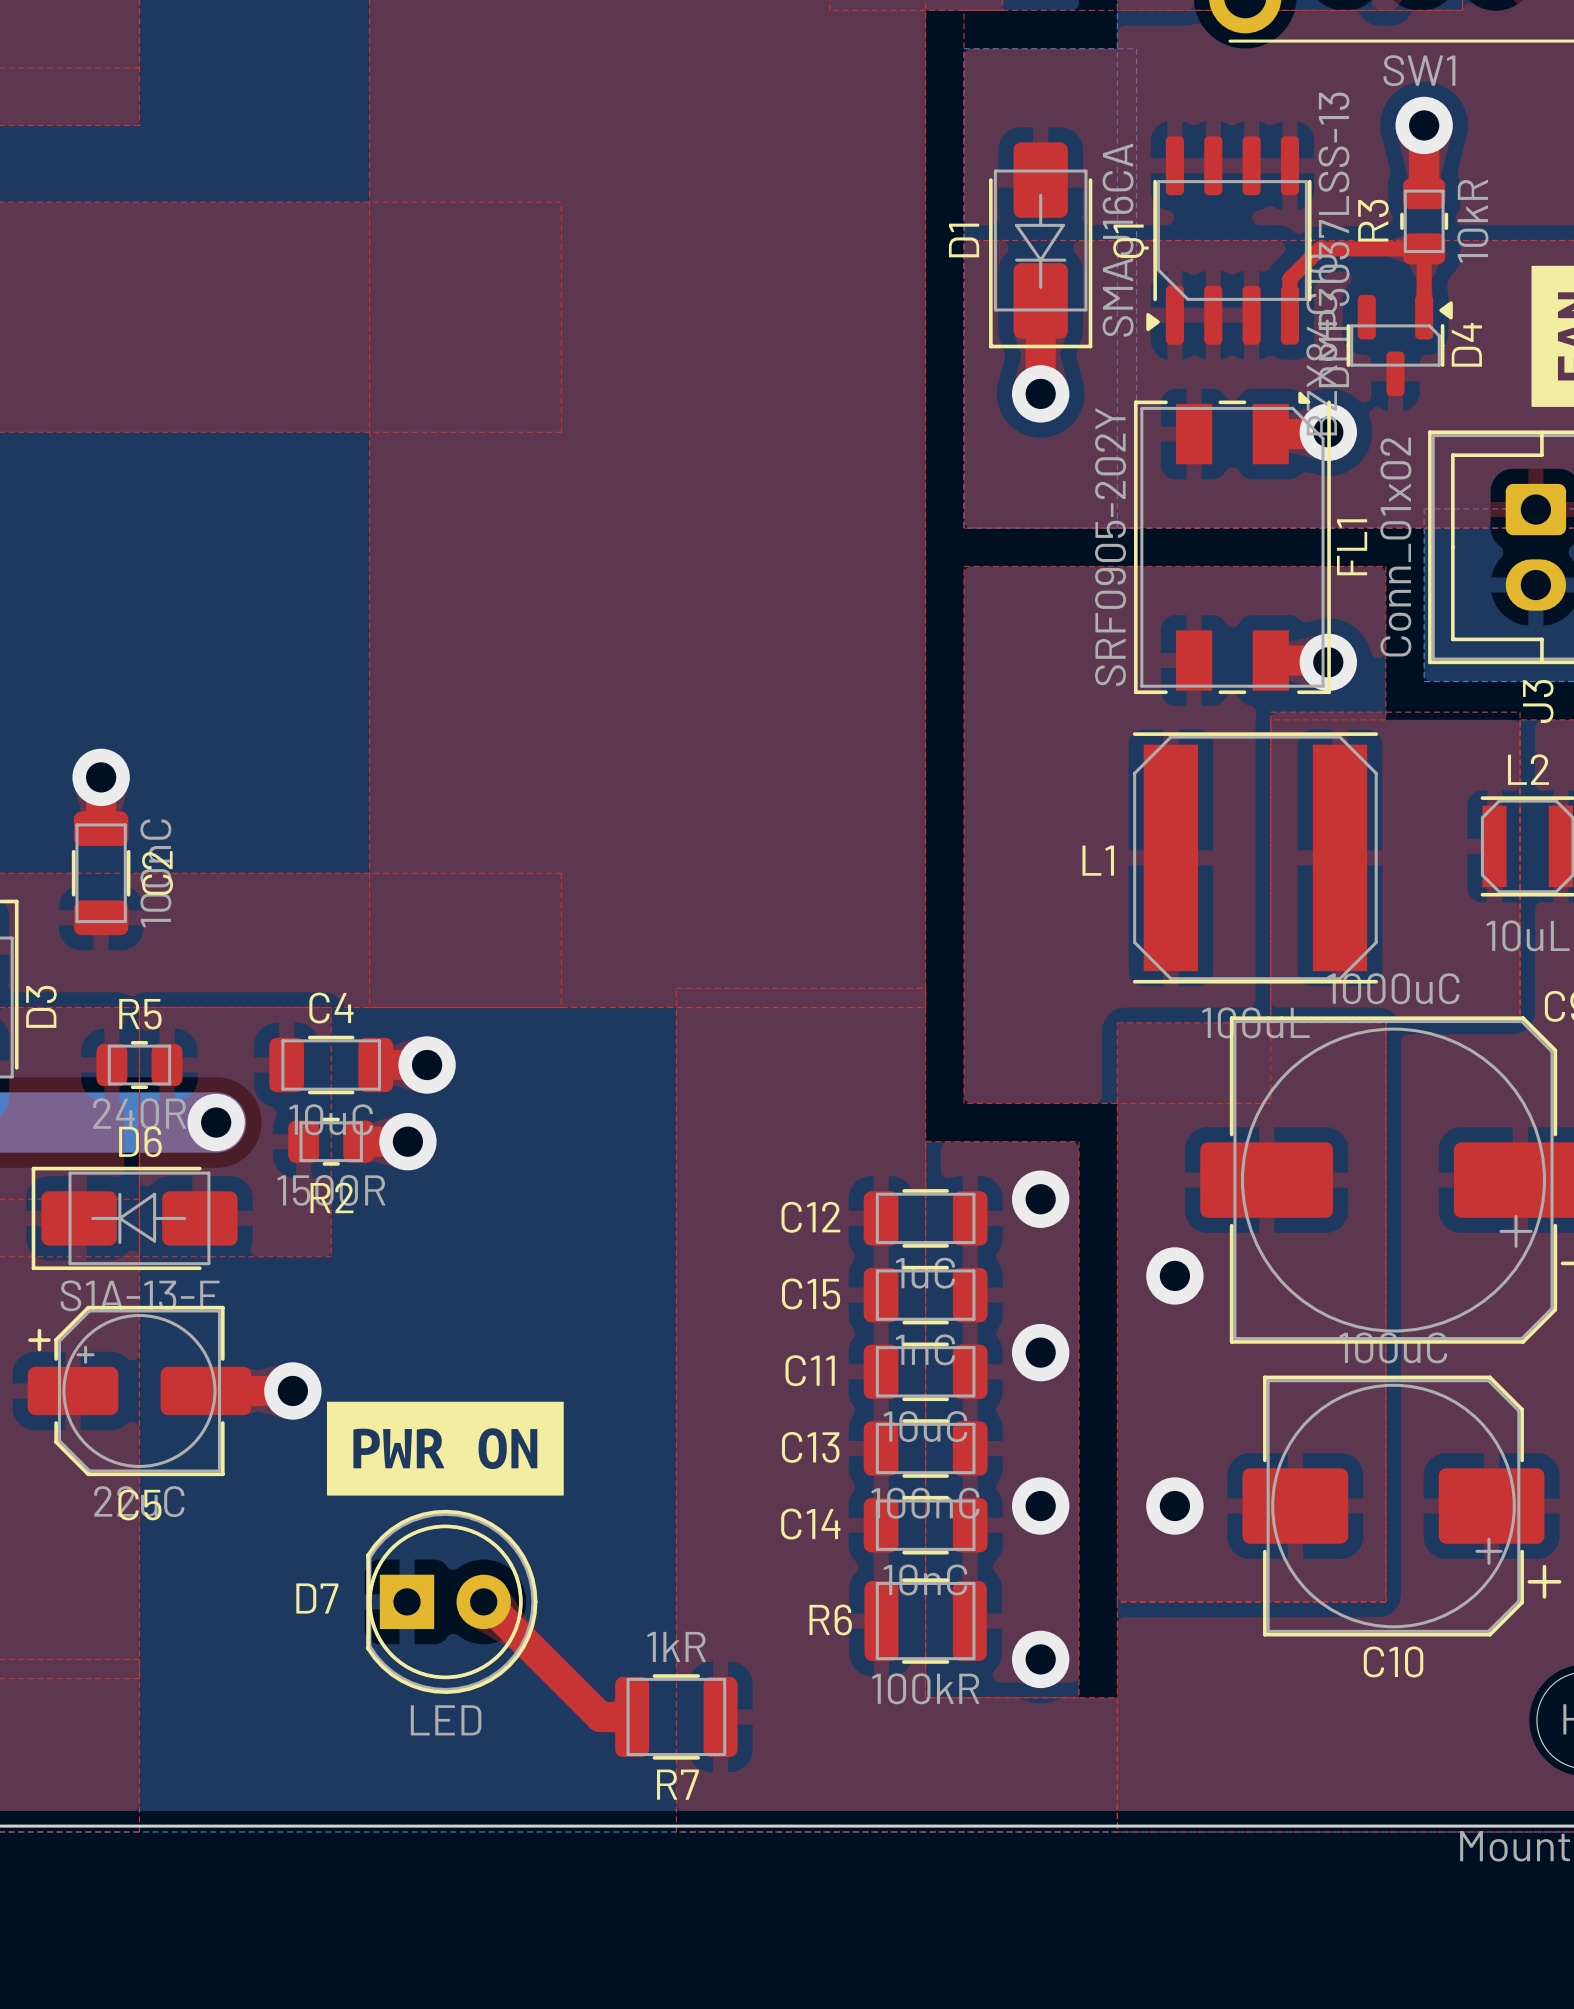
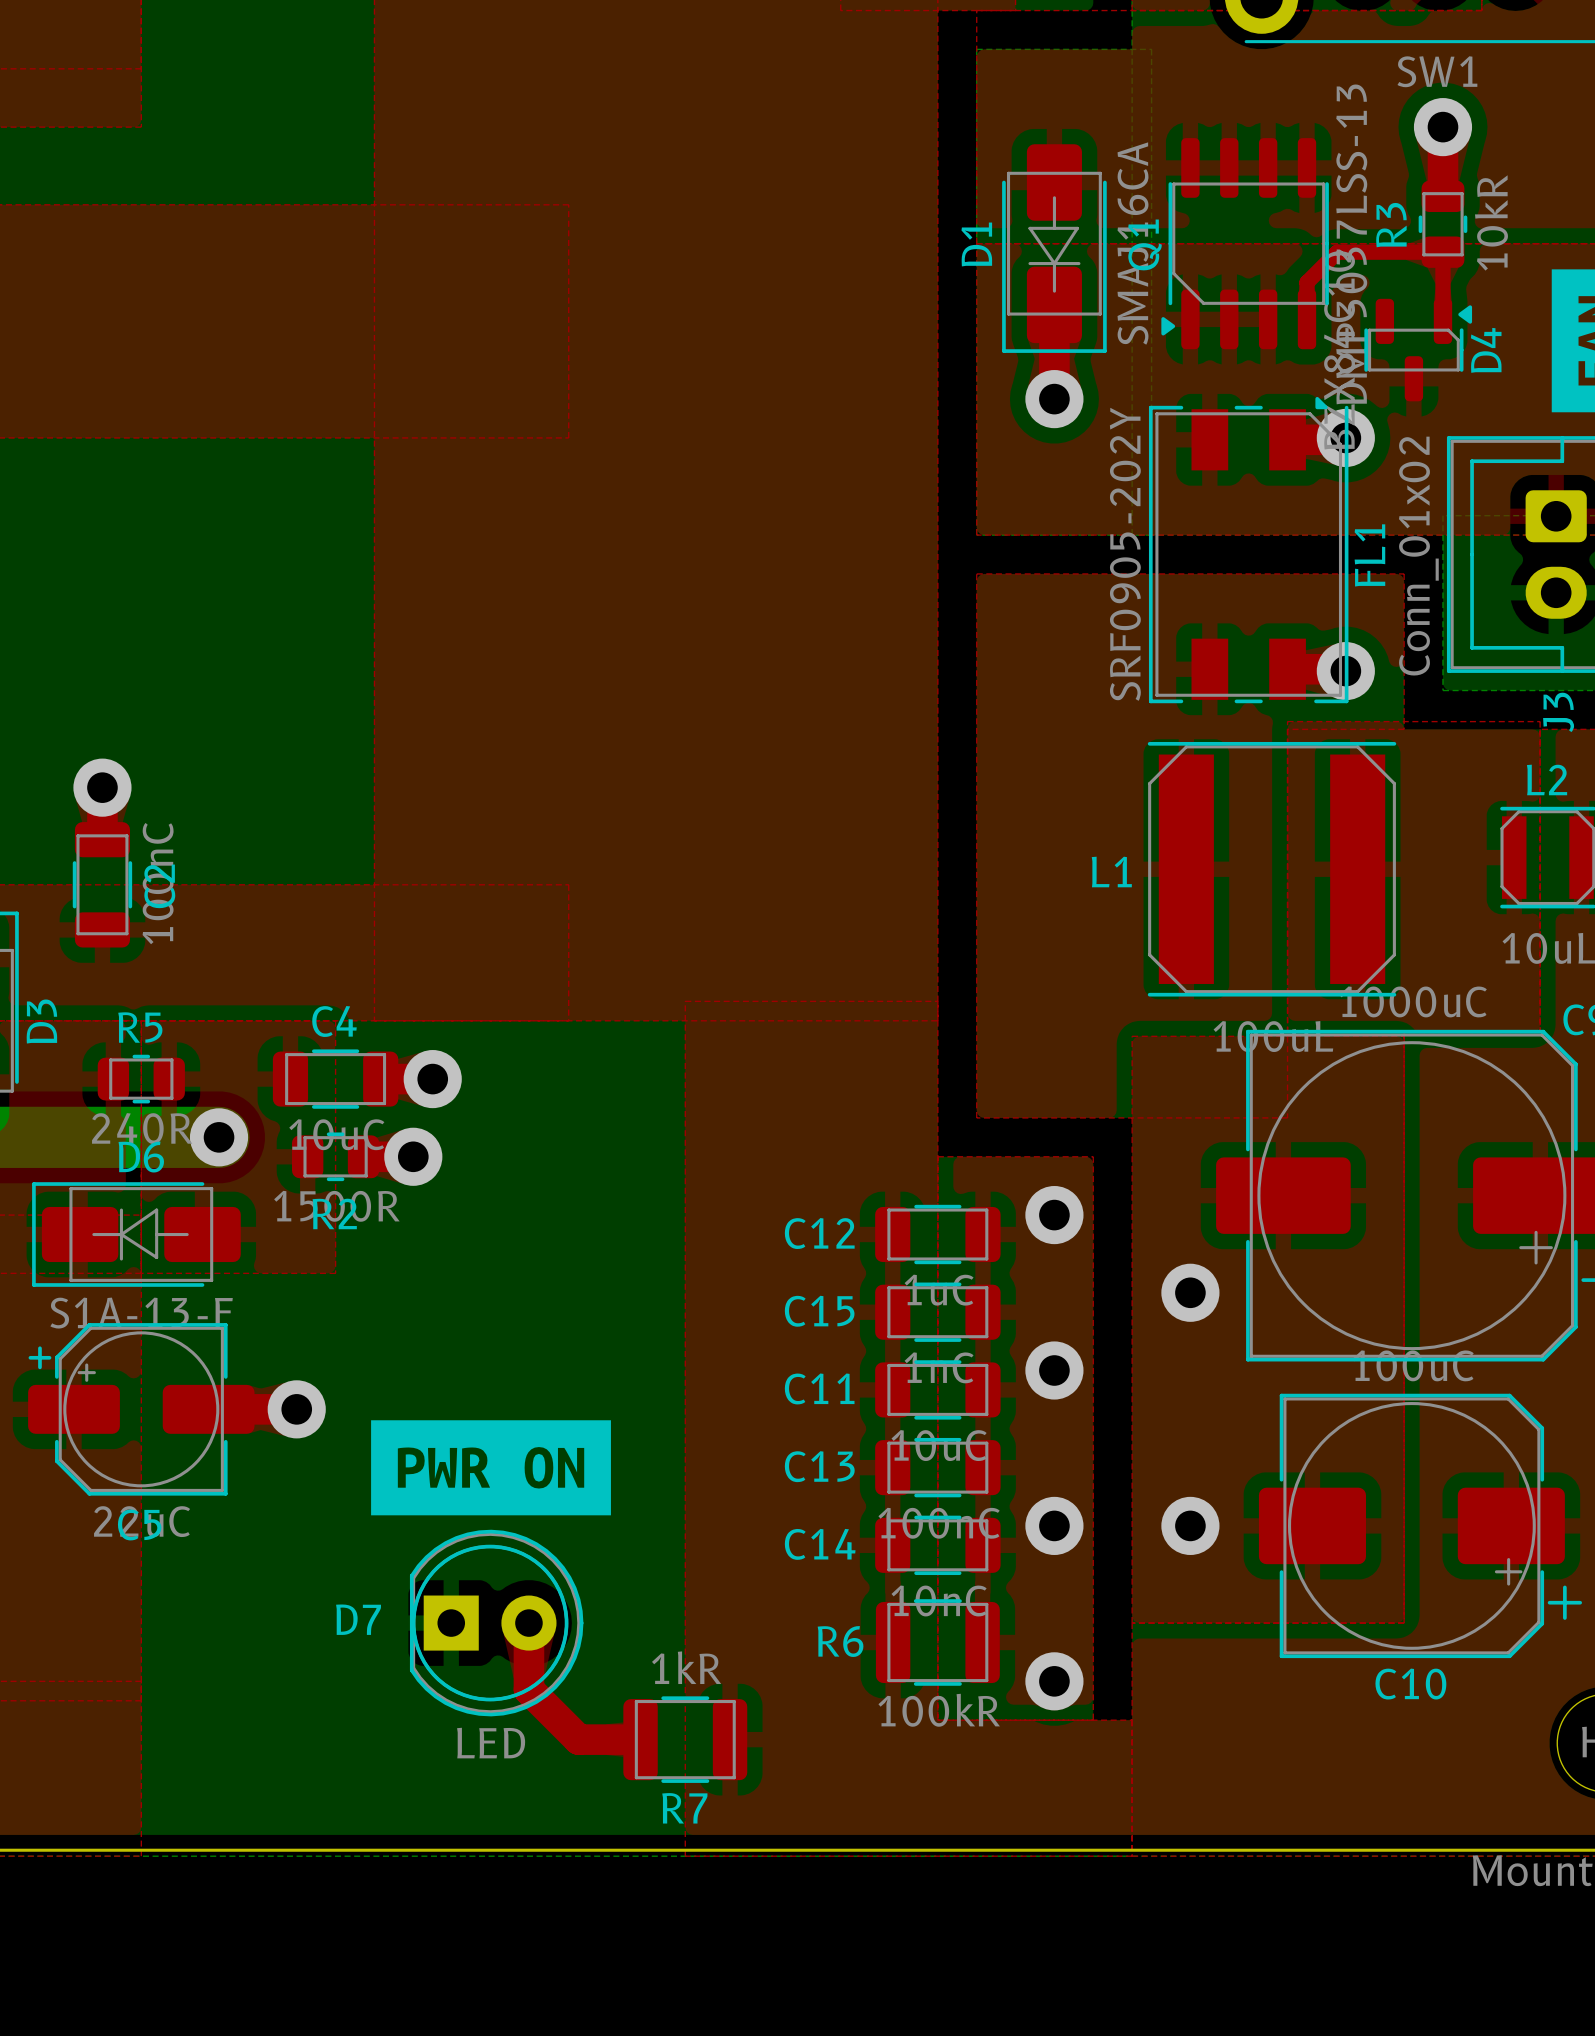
drawing position: (445, 1448) -> (491, 1467)
D7 position: (451, 1601) -> (496, 1623)
top track: (483, 1601) (600, 1716) -> (528, 1623) (528, 1689) (578, 1739) (608, 1739)

